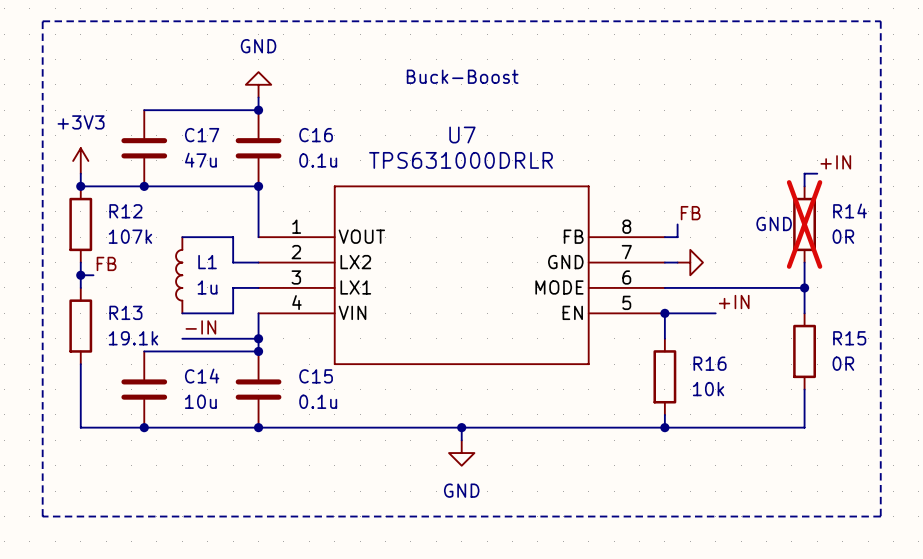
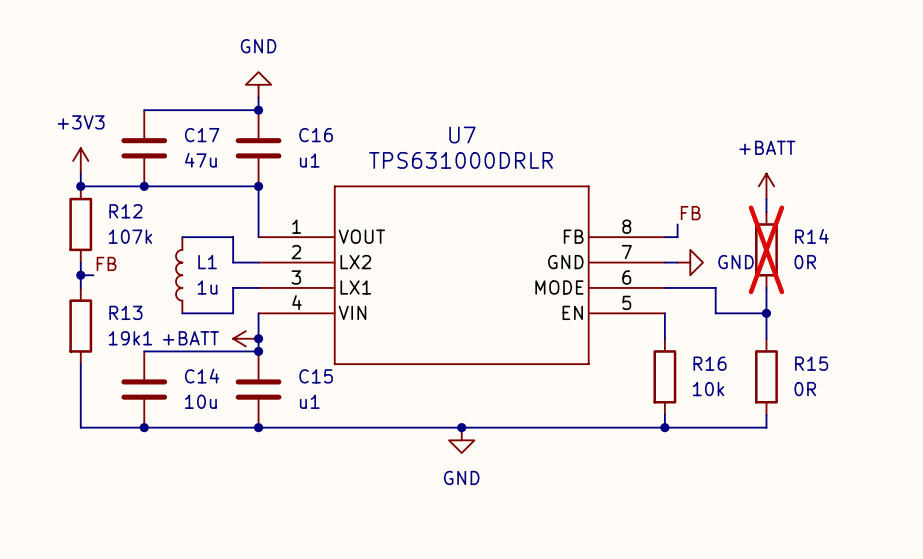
line: (42, 21) (880, 21) (880, 516) (42, 516) (42, 21) -> none
text: Buck-Boost (462, 76) -> none
C16 value: 0.1u (318, 160) -> u1 (309, 160)
label: +IN (835, 162) -> none
wire: (817, 173) (804, 173) (804, 186) -> none
power symbol: none -> +BATT (766, 186)
wire: none -> (766, 199) (766, 211)
power symbol text position: GND (774, 223) -> GND (736, 262)
R14 position: (804, 224) -> (766, 249)
wire: (804, 262) (804, 313) -> (766, 287) (766, 338)
wire: (715, 287) (804, 287) -> (715, 287) (715, 313) (766, 313)
junction position: (804, 287) -> (766, 313)
label: +IN (734, 302) -> none
wire: (664, 313) (715, 313) -> none
junction: (664, 313) -> none
label: -IN (200, 327) -> none
R13 value: 19.1k (133, 338) -> 19k1 (130, 338)
wire: (182, 338) (258, 338) -> none
power symbol: none -> +BATT (245, 338)
R15 position: (804, 351) -> (766, 376)
wire: (804, 389) (804, 427) (766, 427) -> (766, 414) (766, 427)
C15 value: 0.1u (318, 401) -> u1 (309, 401)
power symbol position: GND (461, 453) -> GND (461, 440)

